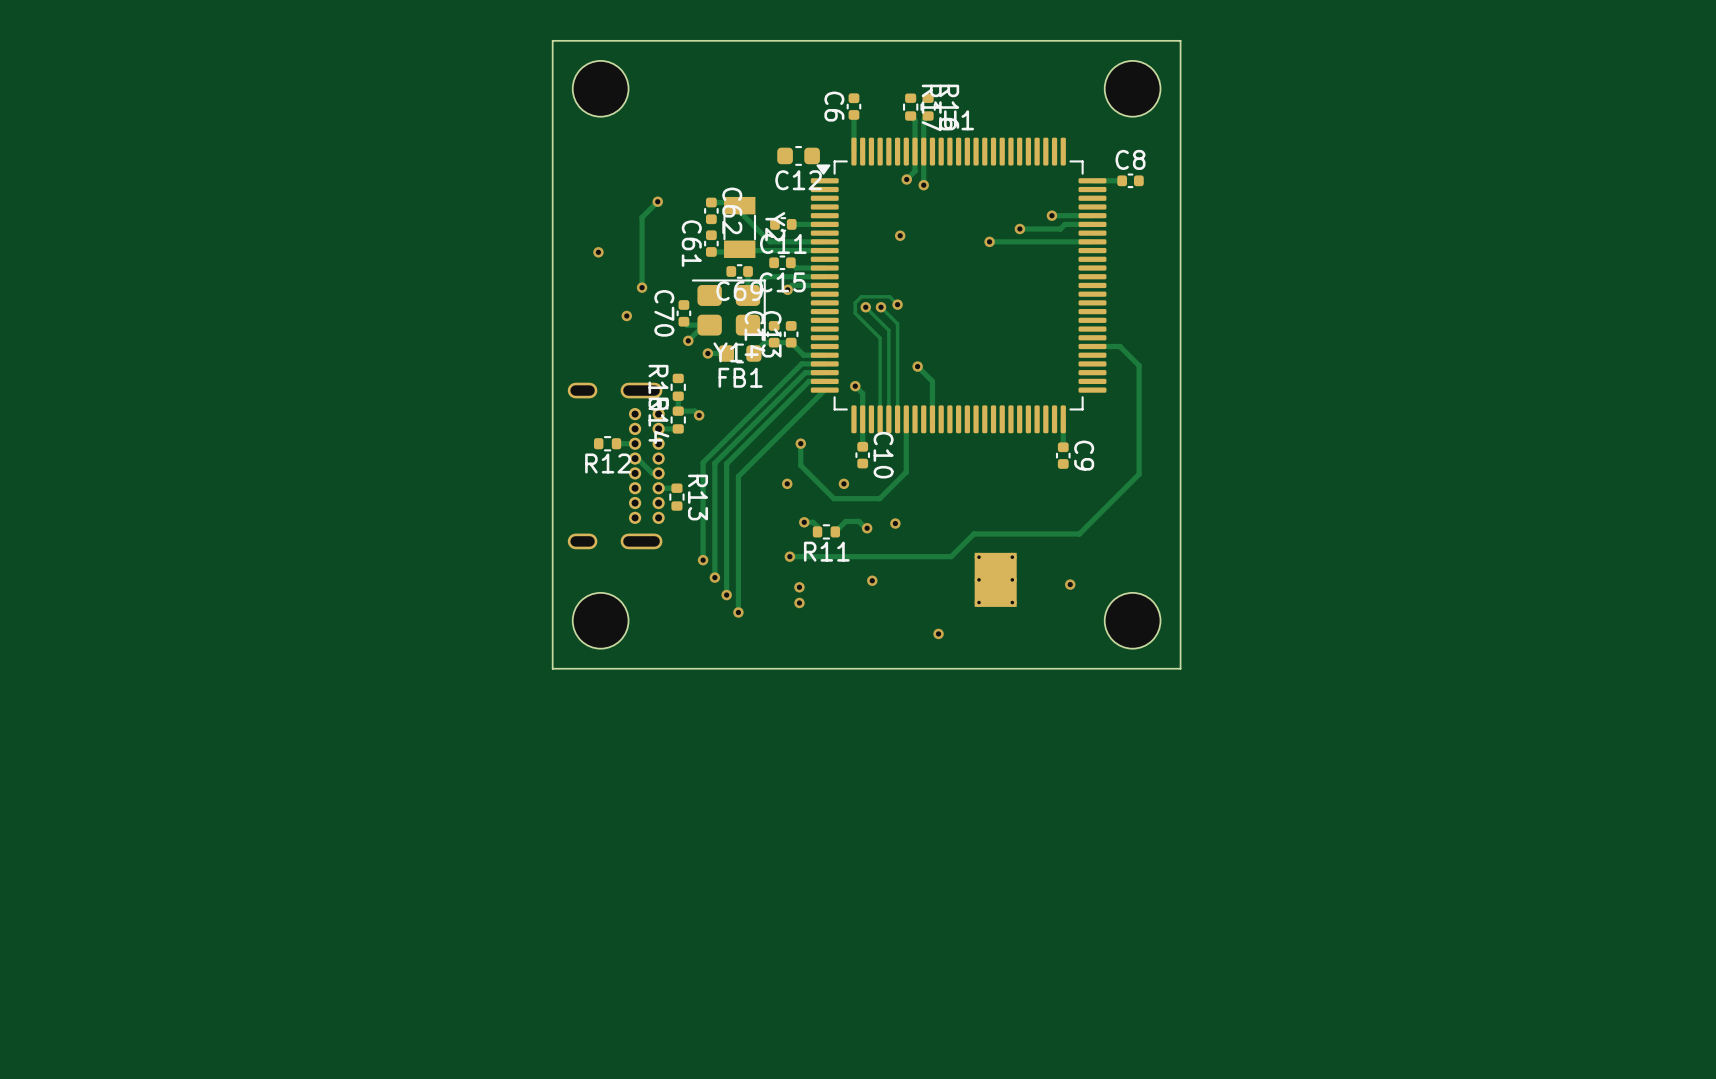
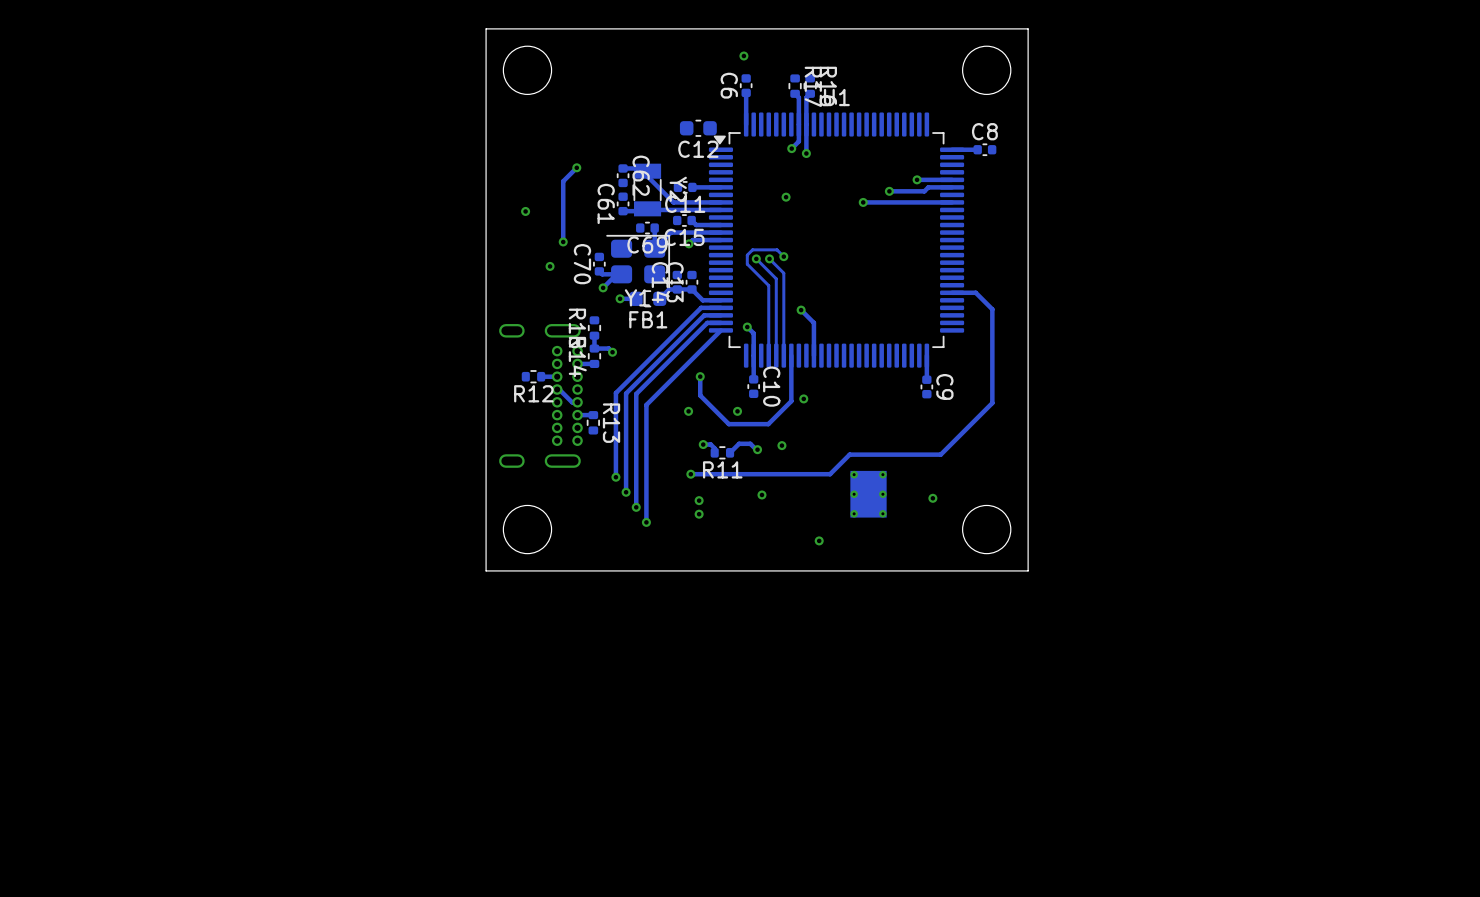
via: none -> (743, 56)
via: none -> (803, 398)

